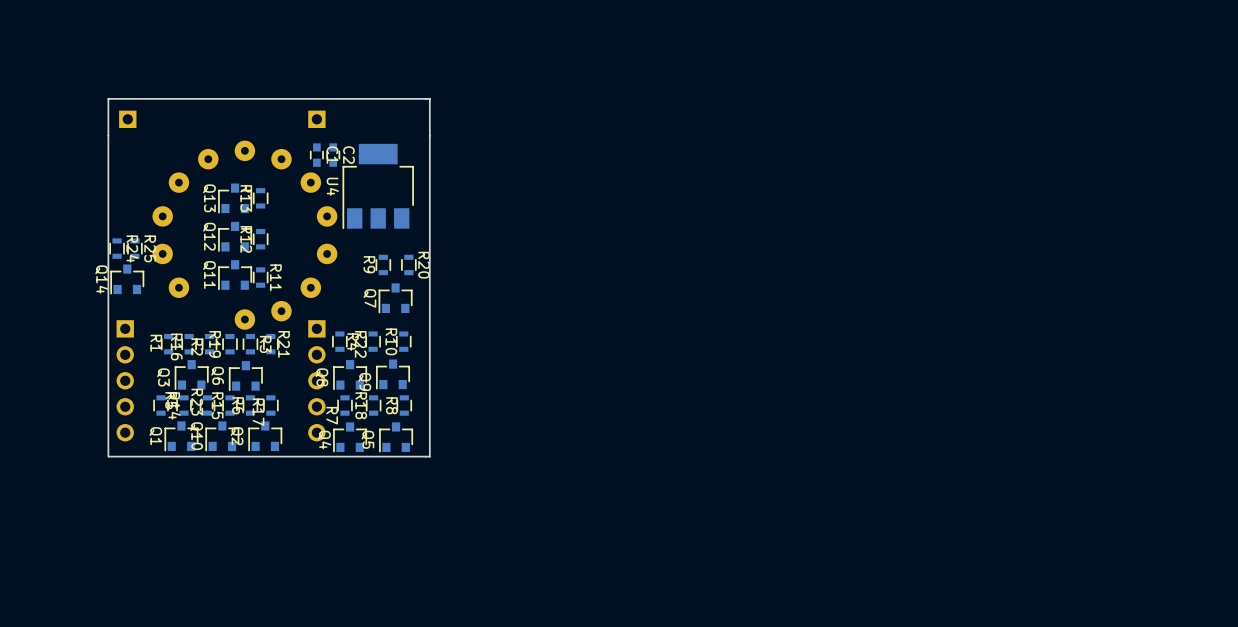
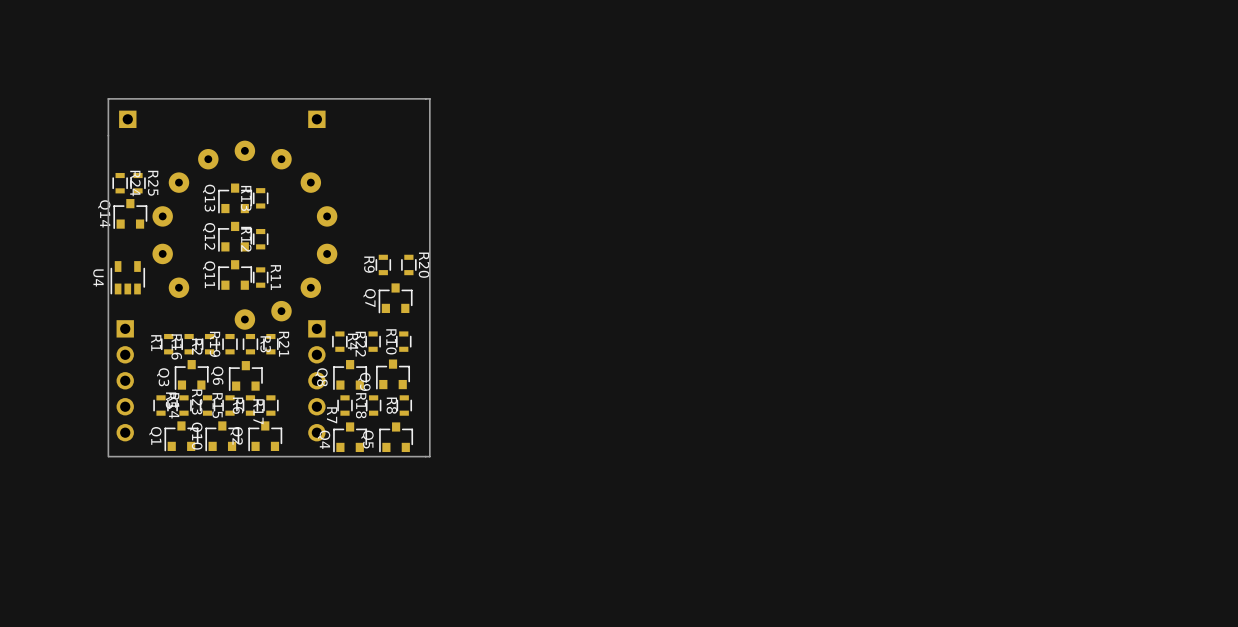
U4 footprint: [342, 143, 414, 229] -> [110, 261, 145, 295]
C1: (316, 155) -> none
C2: (333, 155) -> none
R24 position: (117, 248) -> (120, 183)
R25 position: (134, 248) -> (138, 183)
Q14 position: (127, 279) -> (130, 213)

